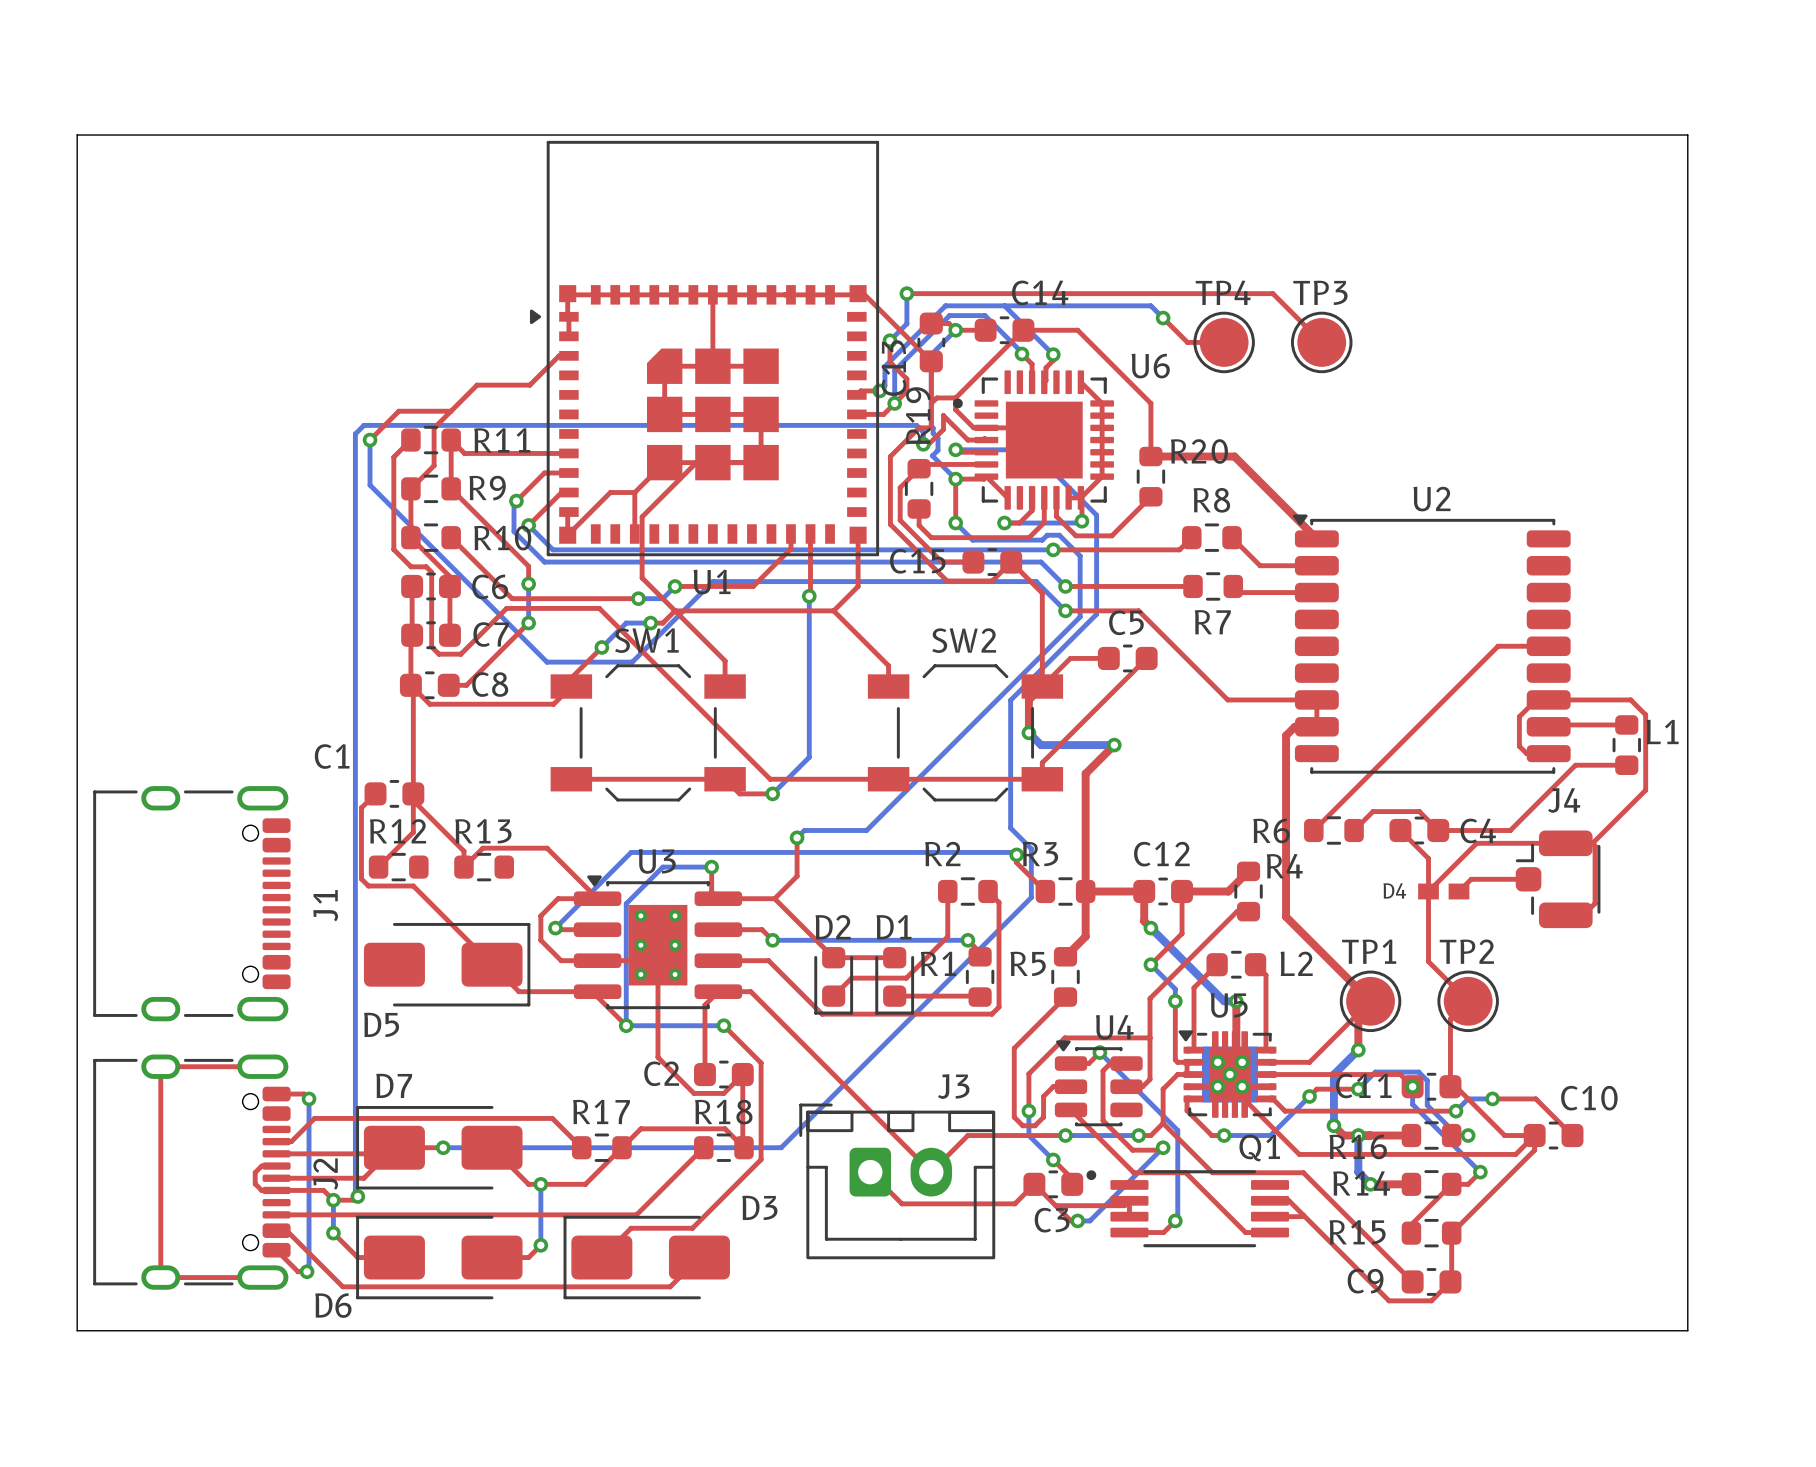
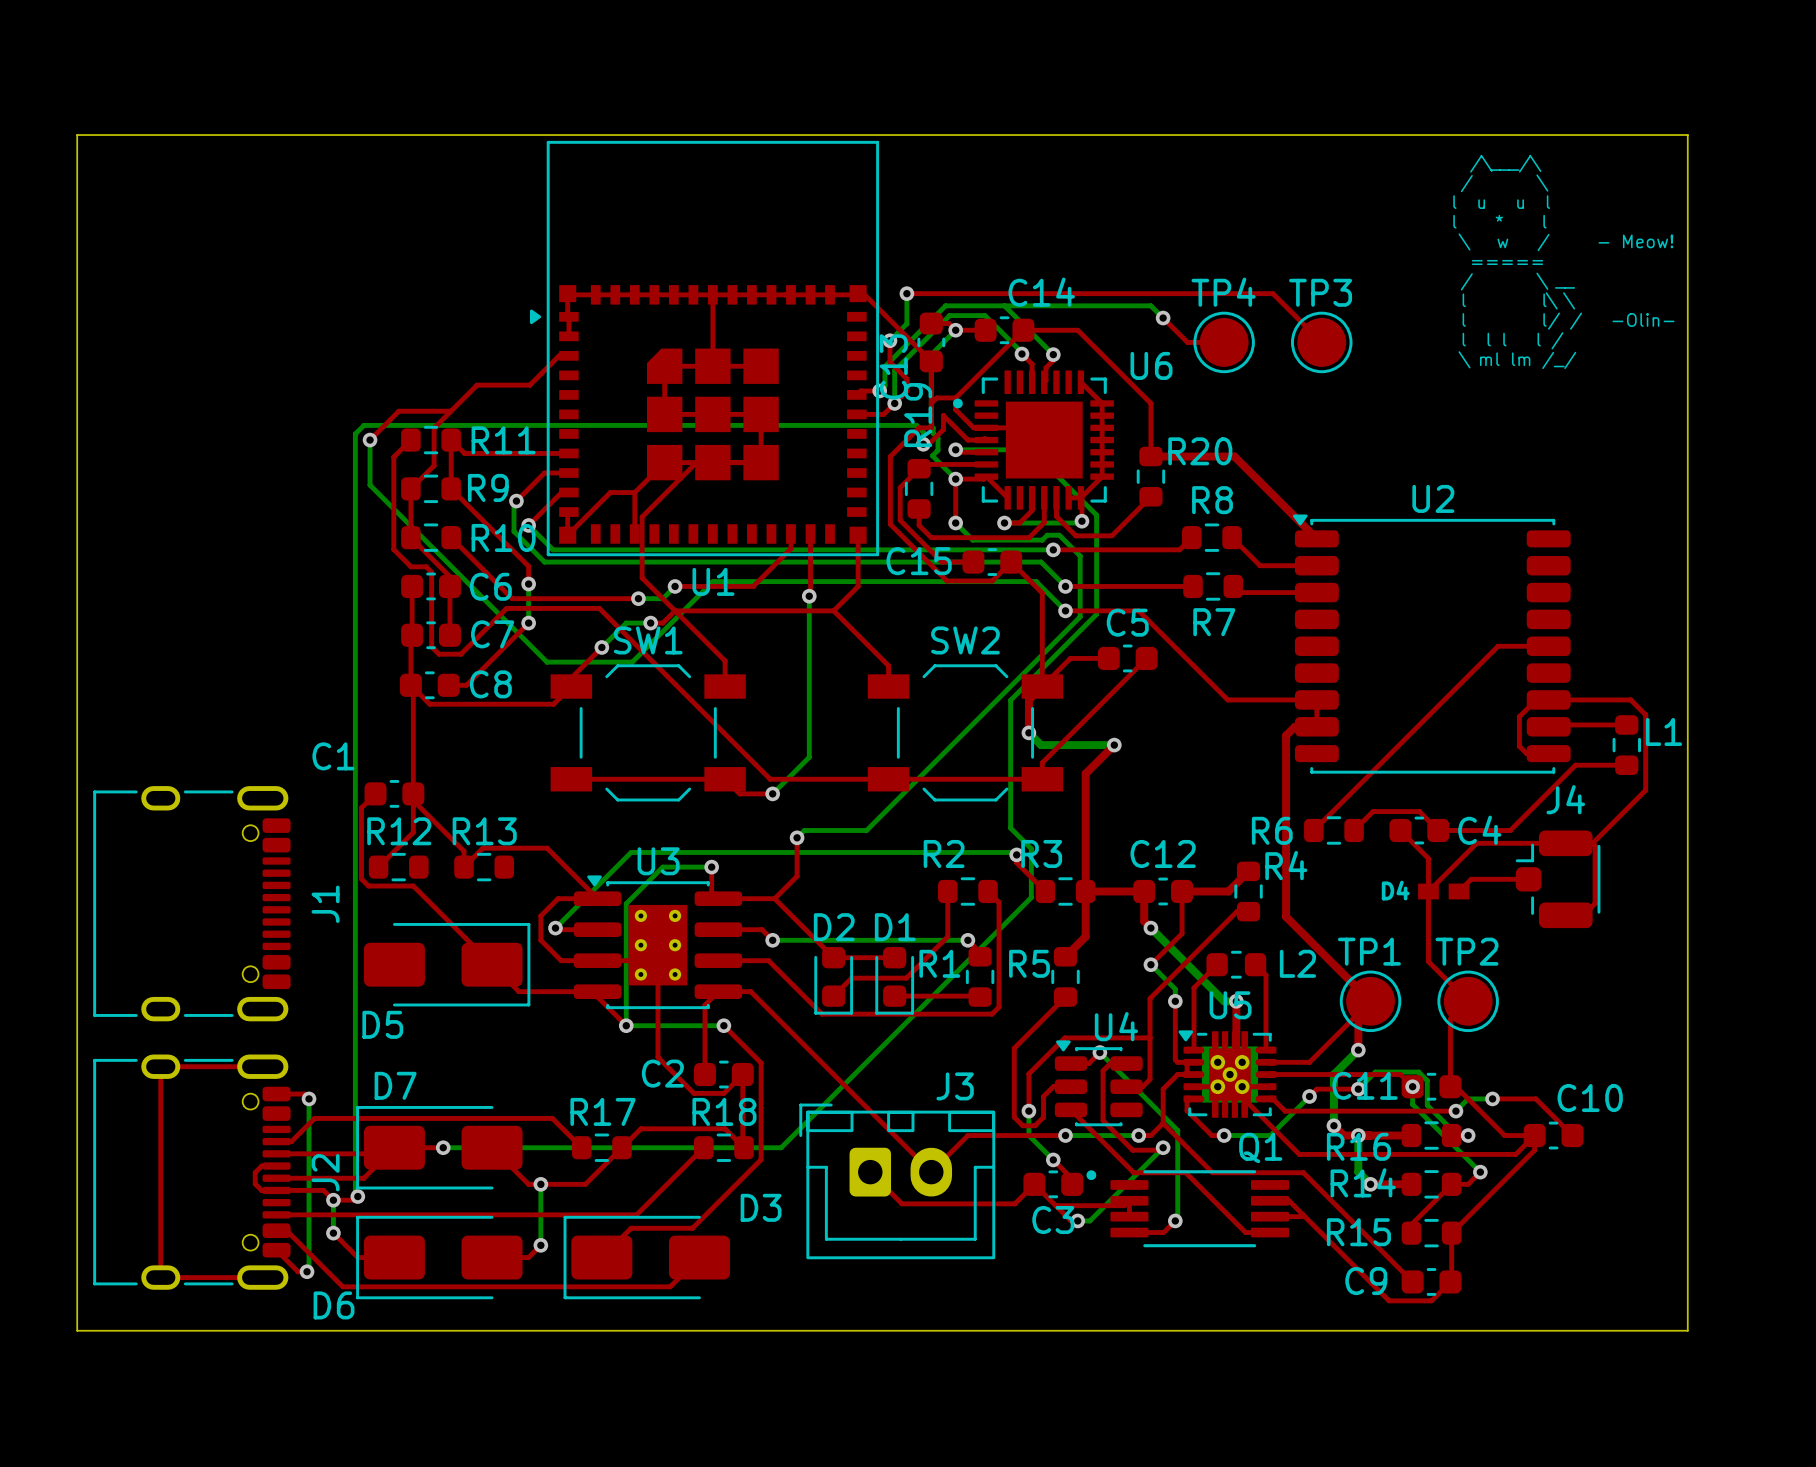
text: none -> /\___/\ (1505, 163)
text: none -> / \ (1504, 183)
text: none -> l u u l (1501, 202)
text: none -> l * l (1499, 221)
text: none -> \ w / - Meow! (1565, 242)
text: none -> ===== (1507, 262)
text: none -> / \ __ (1517, 281)
text: none -> l l\ \ (1518, 300)
text: none -> l l/ / -Olin- (1568, 321)
text: none -> l l l l / (1513, 340)
text: none -> \ ml lm /_/ (1517, 360)

